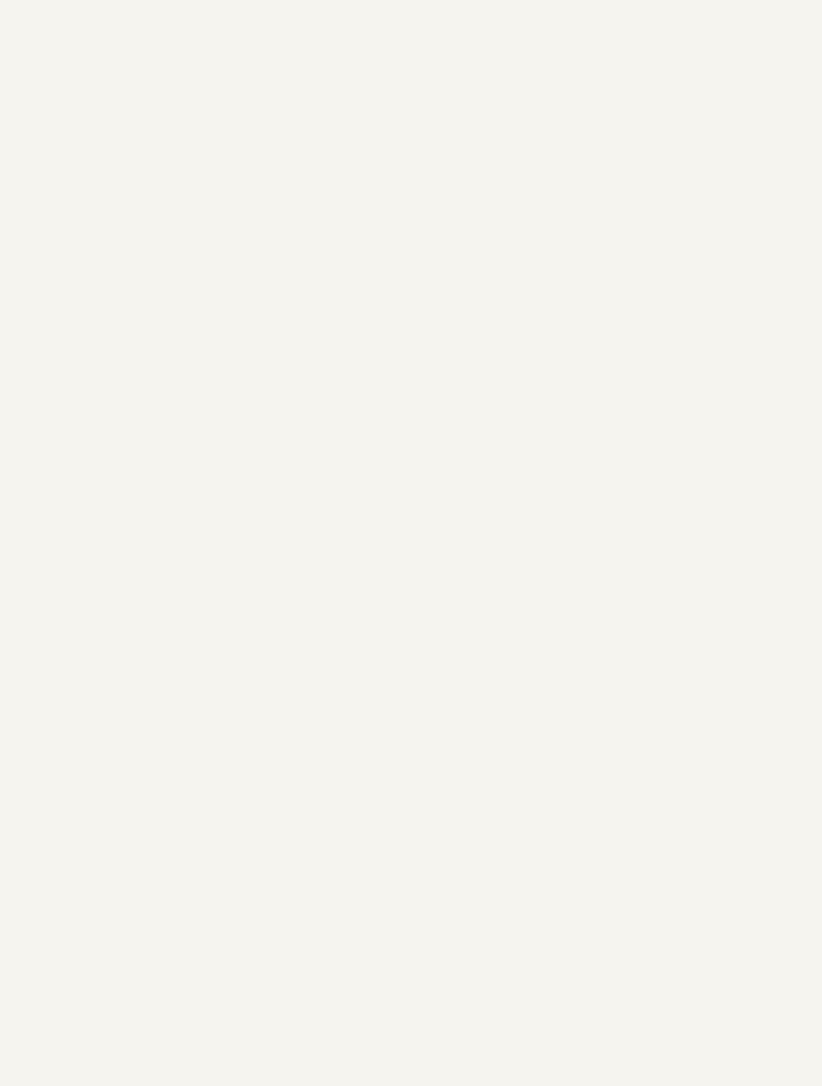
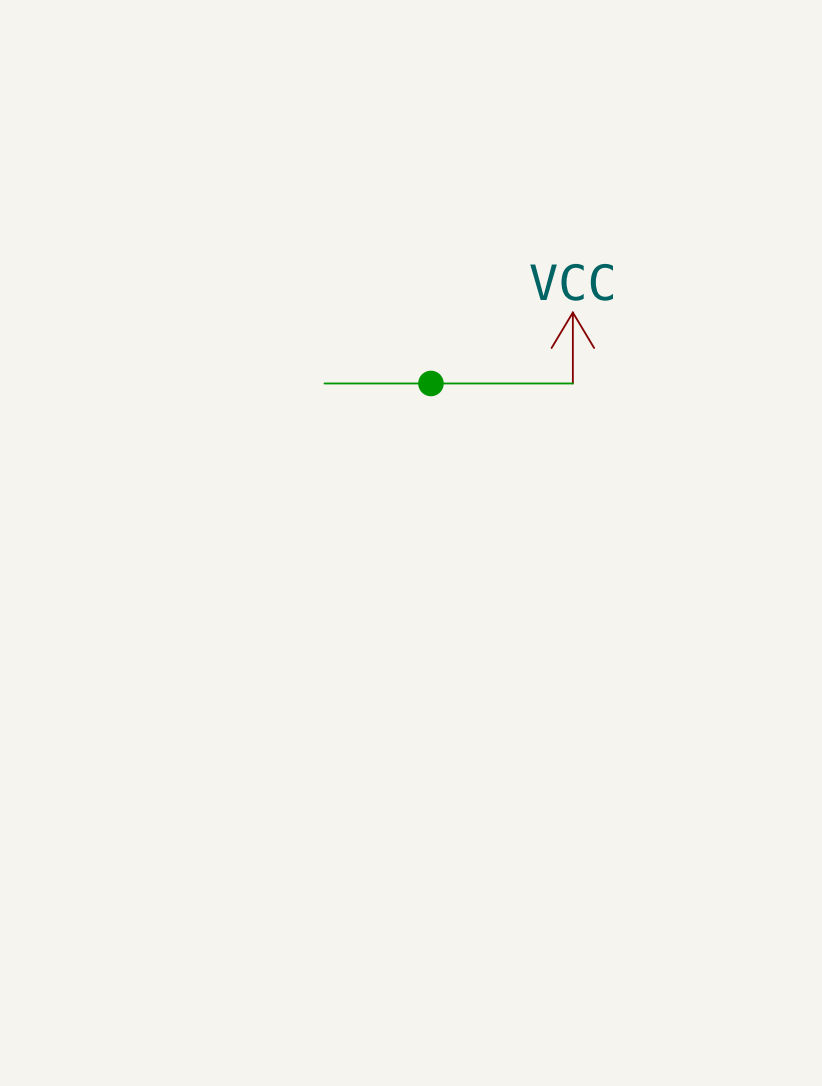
power symbol: none -> VCC (572, 347)
wire: none -> (324, 383) (572, 383)
junction: none -> (430, 383)

